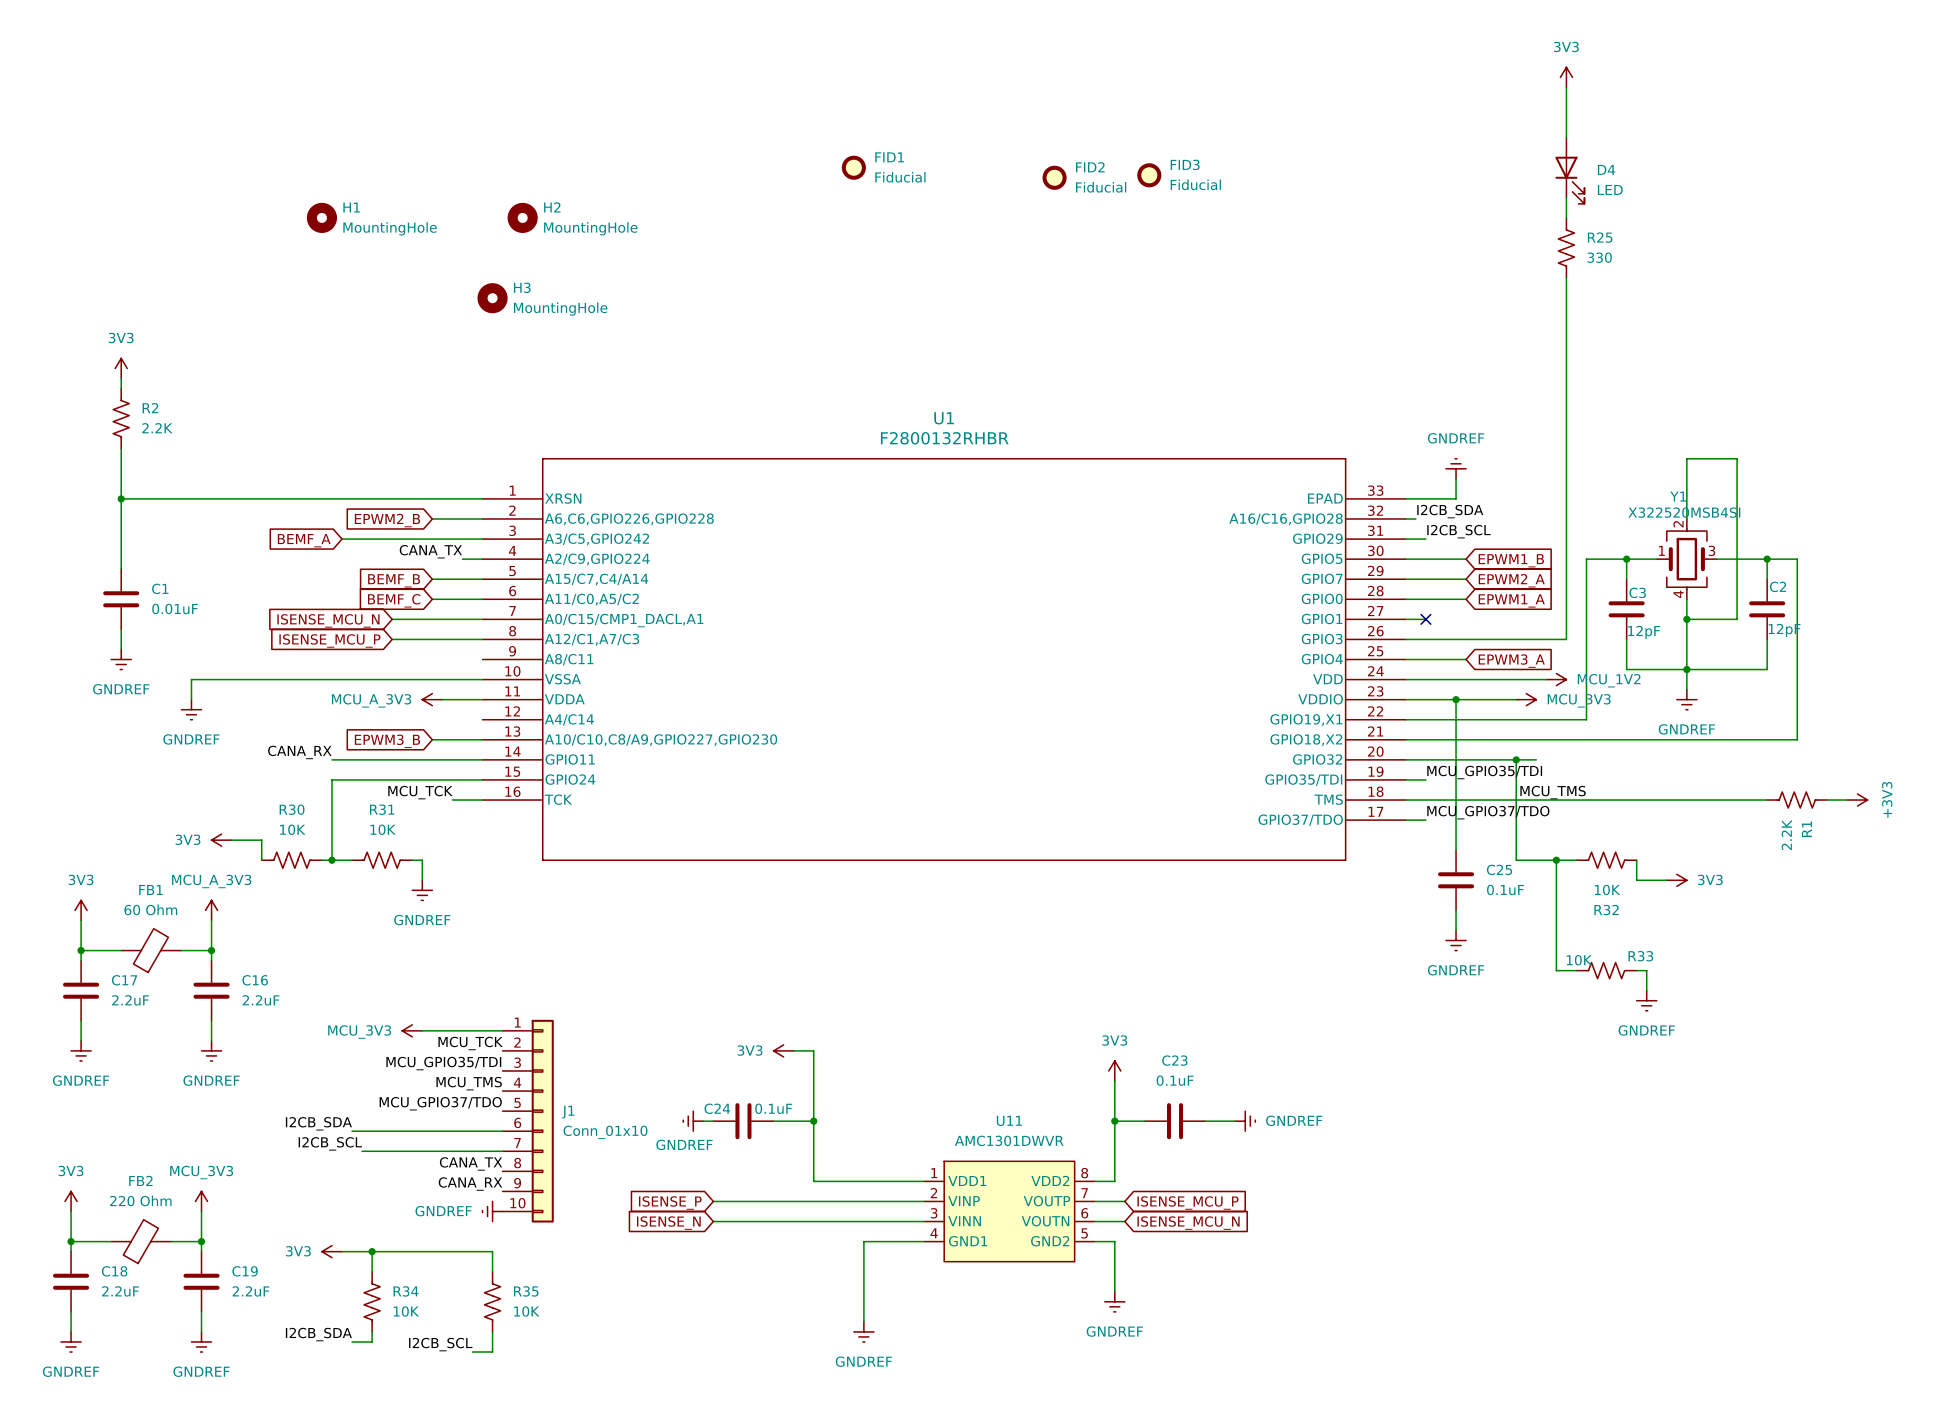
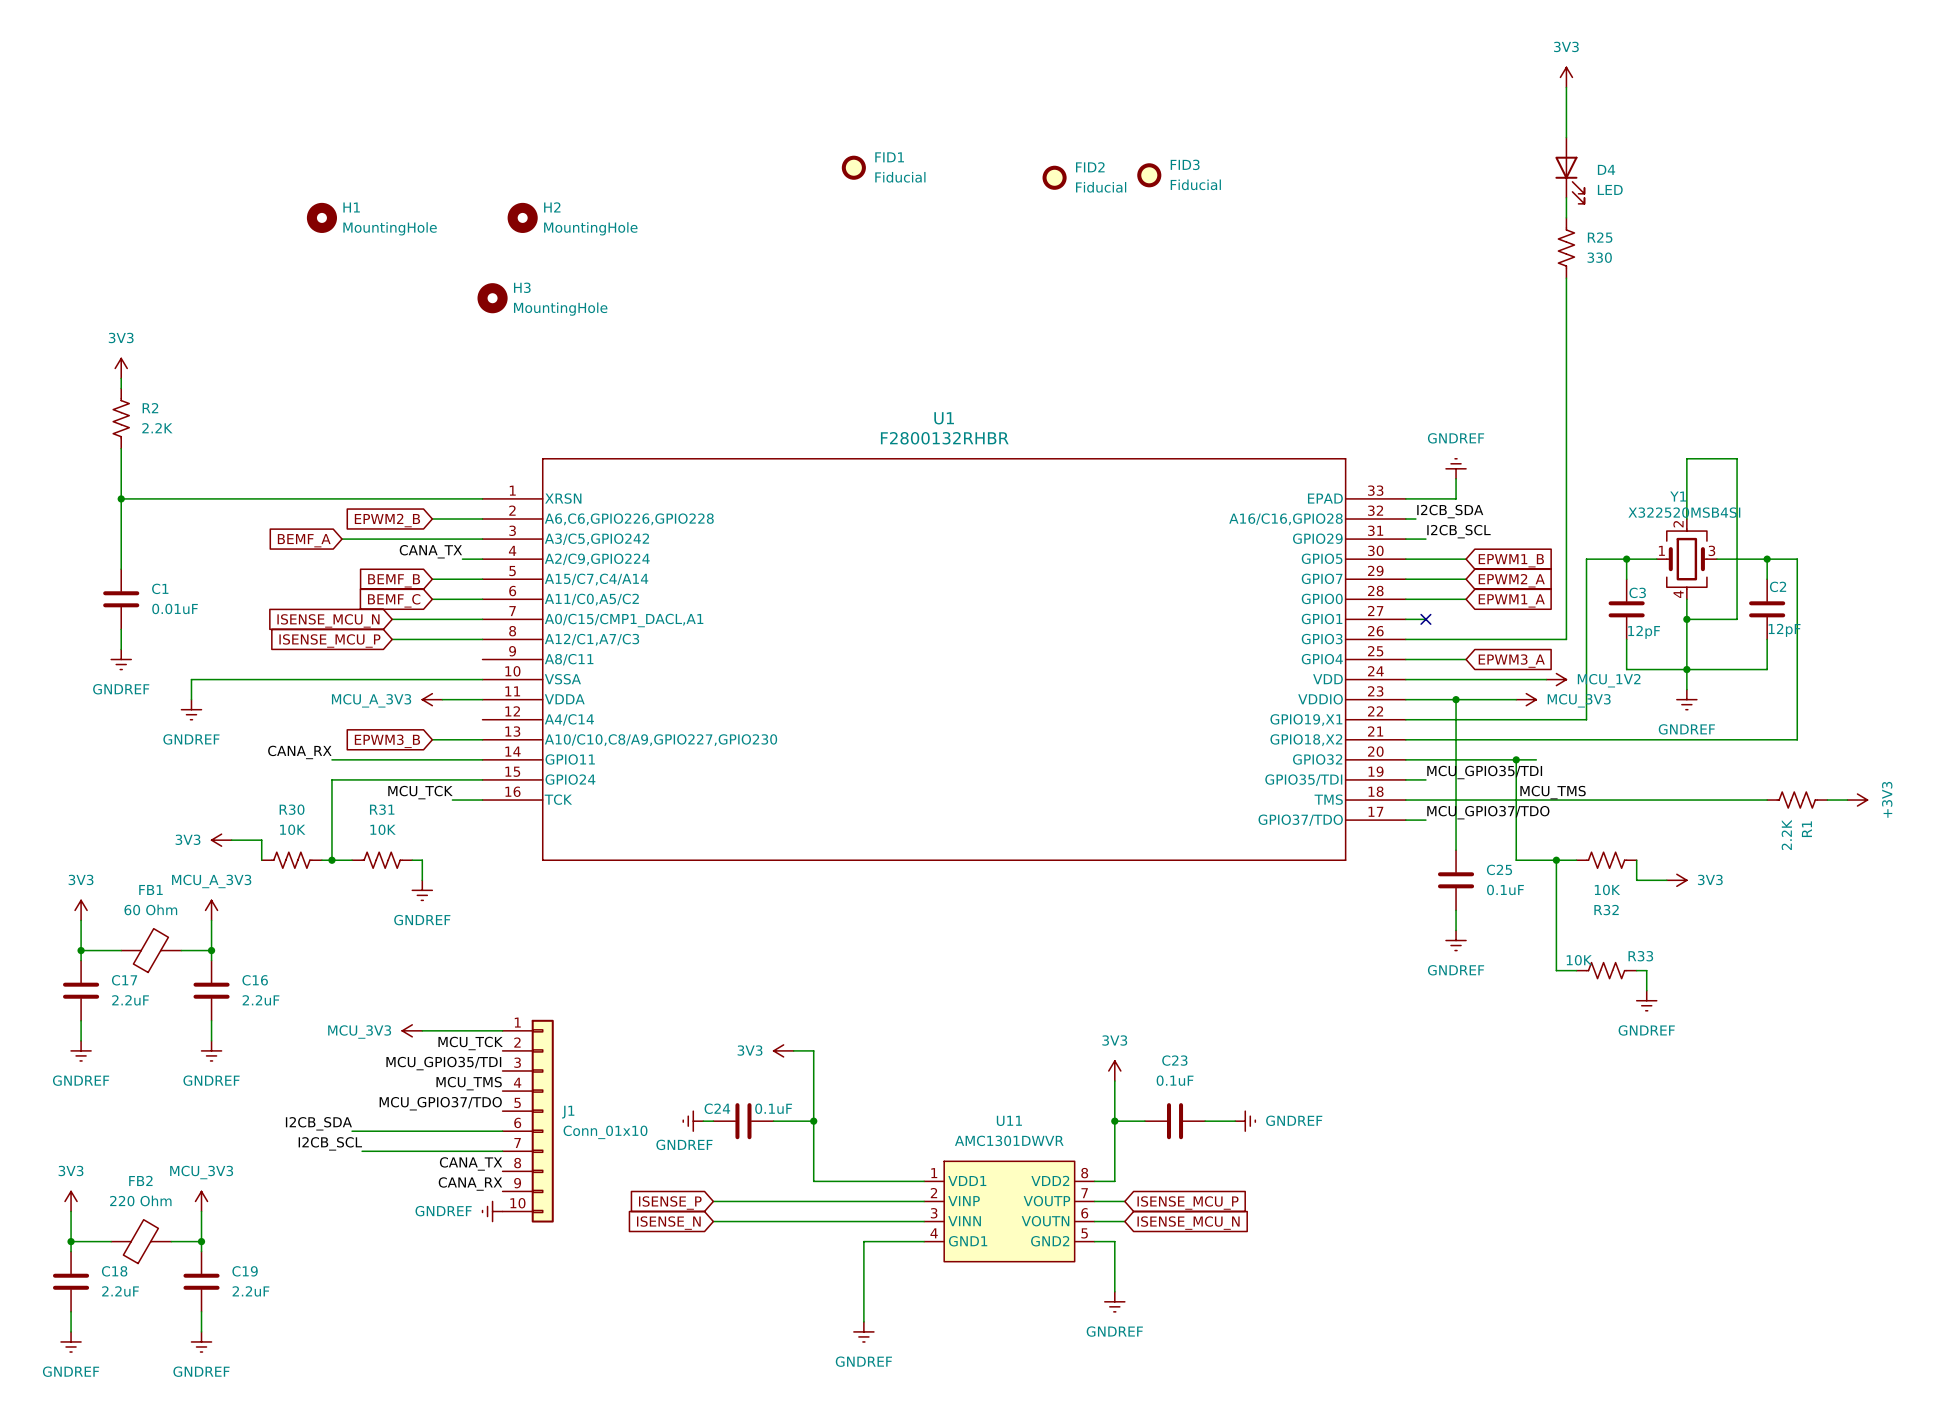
power symbol: 3V3 (331, 1251) -> none
wire: (342, 1251) (492, 1251) (492, 1271) -> none
wire: (372, 1251) (372, 1271) -> none
junction: (372, 1251) -> none
R34: 10K (372, 1301) -> none
R35: 10K (492, 1301) -> none
wire: (372, 1331) (372, 1341) (352, 1341) -> none
wire: (492, 1331) (492, 1352) (472, 1352) -> none
label: I2CB_SDA (318, 1334) -> none
label: I2CB_SCL (440, 1344) -> none

